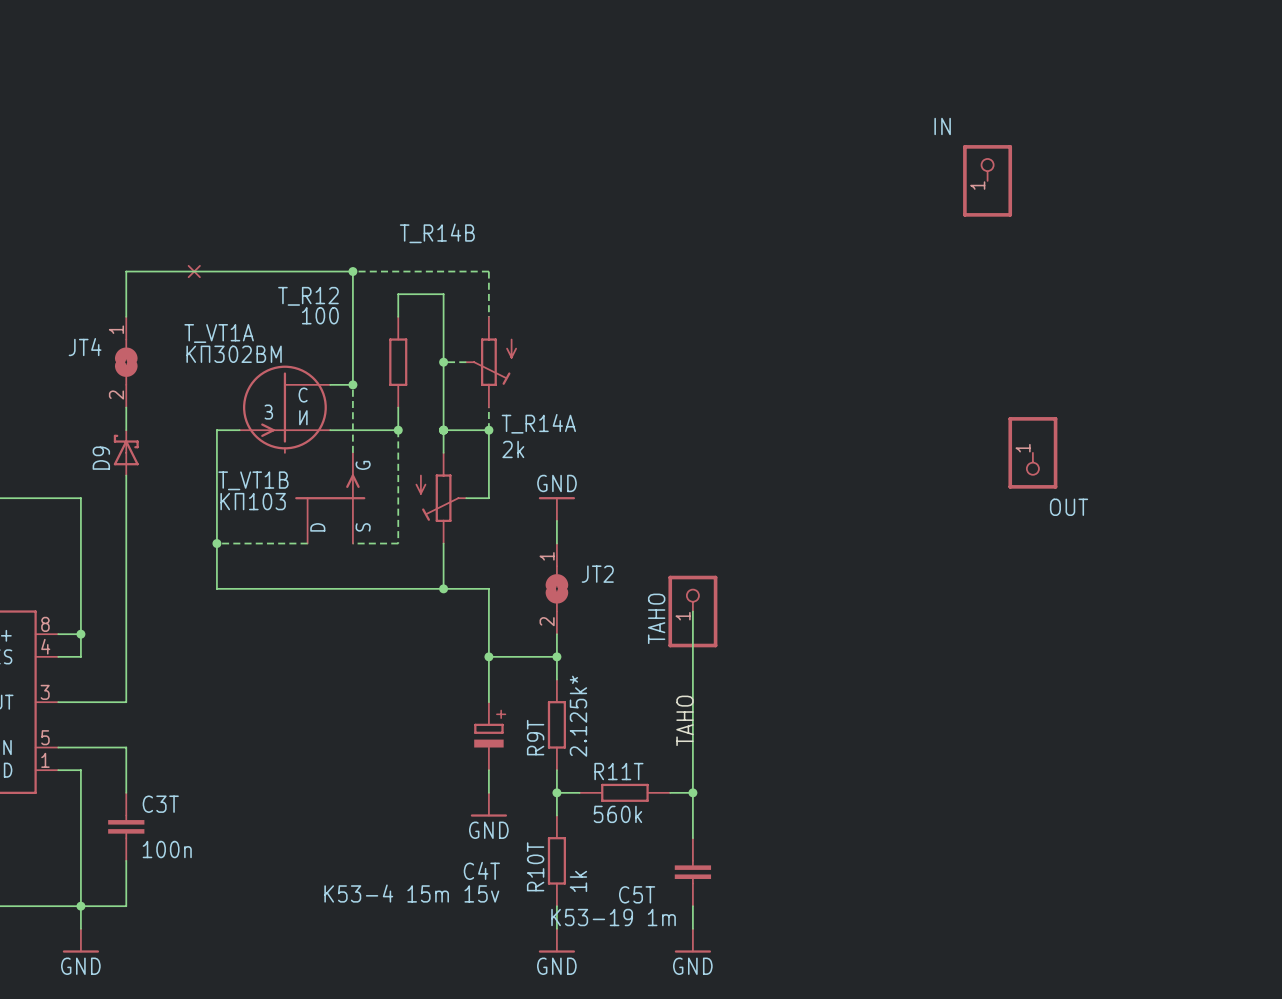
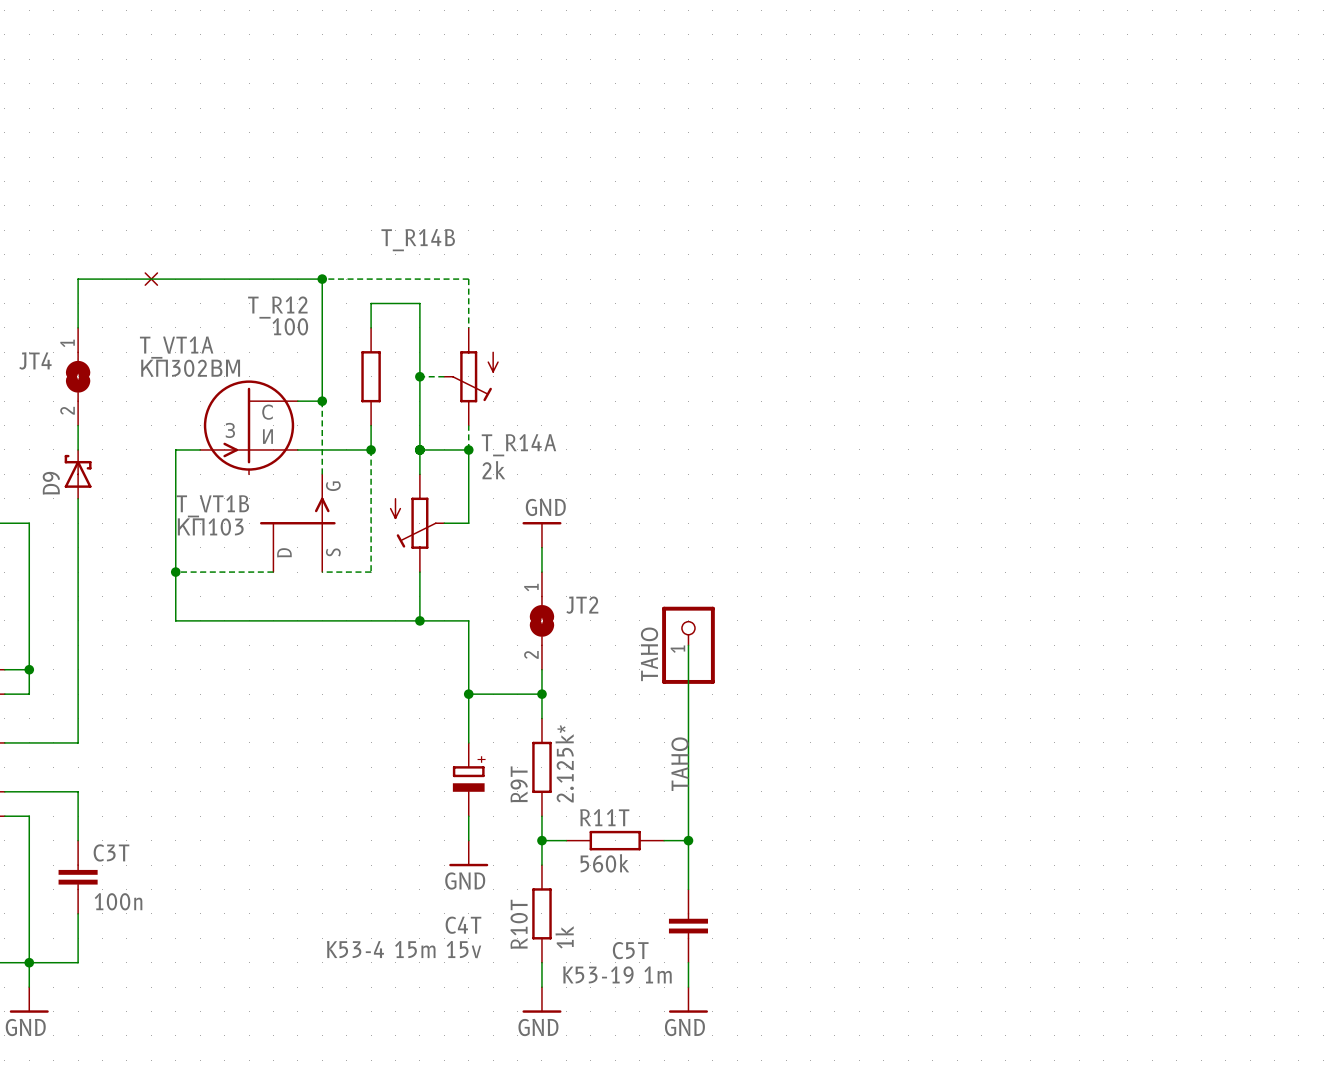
IN: (987, 180) -> none
OUT: (1032, 452) -> none

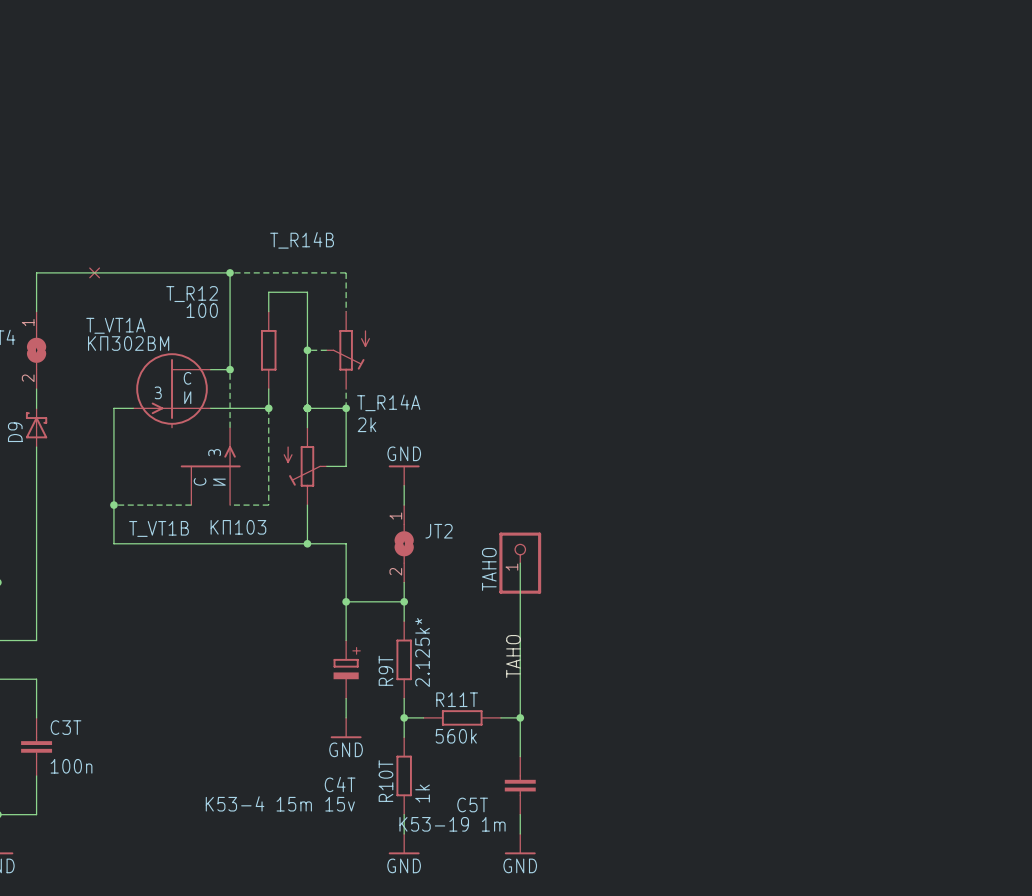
T_VT1B text: G (333, 486) -> none
T_VT1B text: none -> З (214, 452)
T_VT1B name position: T_VT1B (212, 506) -> T_VT1B (159, 528)
T_VT1B value position: КП103 (210, 526) -> КП103 (238, 527)
T_VT1B text: none -> С (200, 481)
T_VT1B text: none -> И (219, 482)
T_VT1B text: D (284, 552) -> none
T_VT1B text: S (333, 552) -> none

